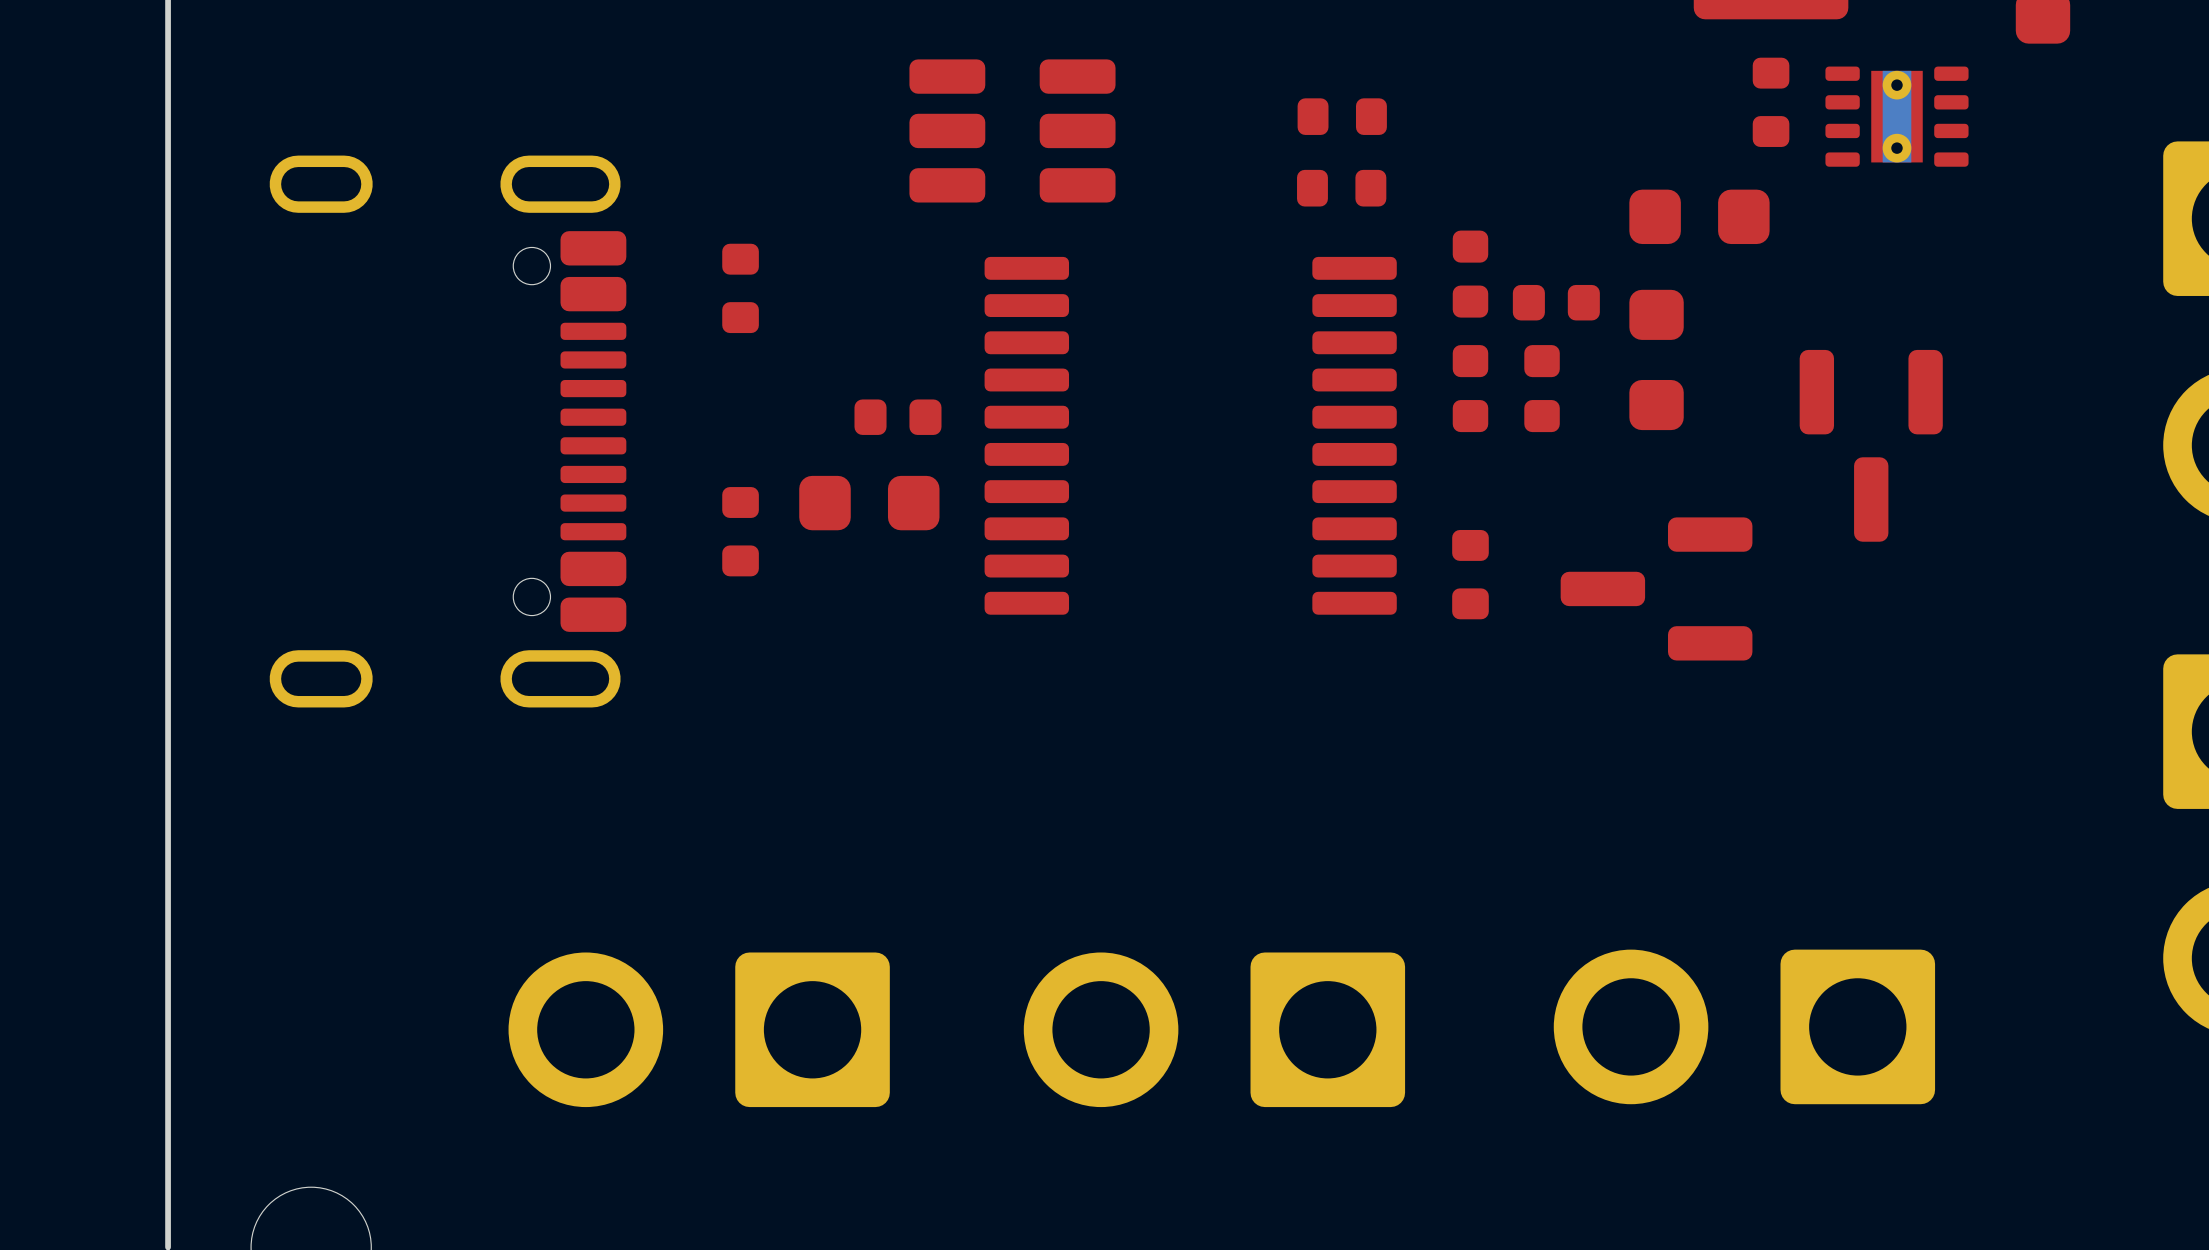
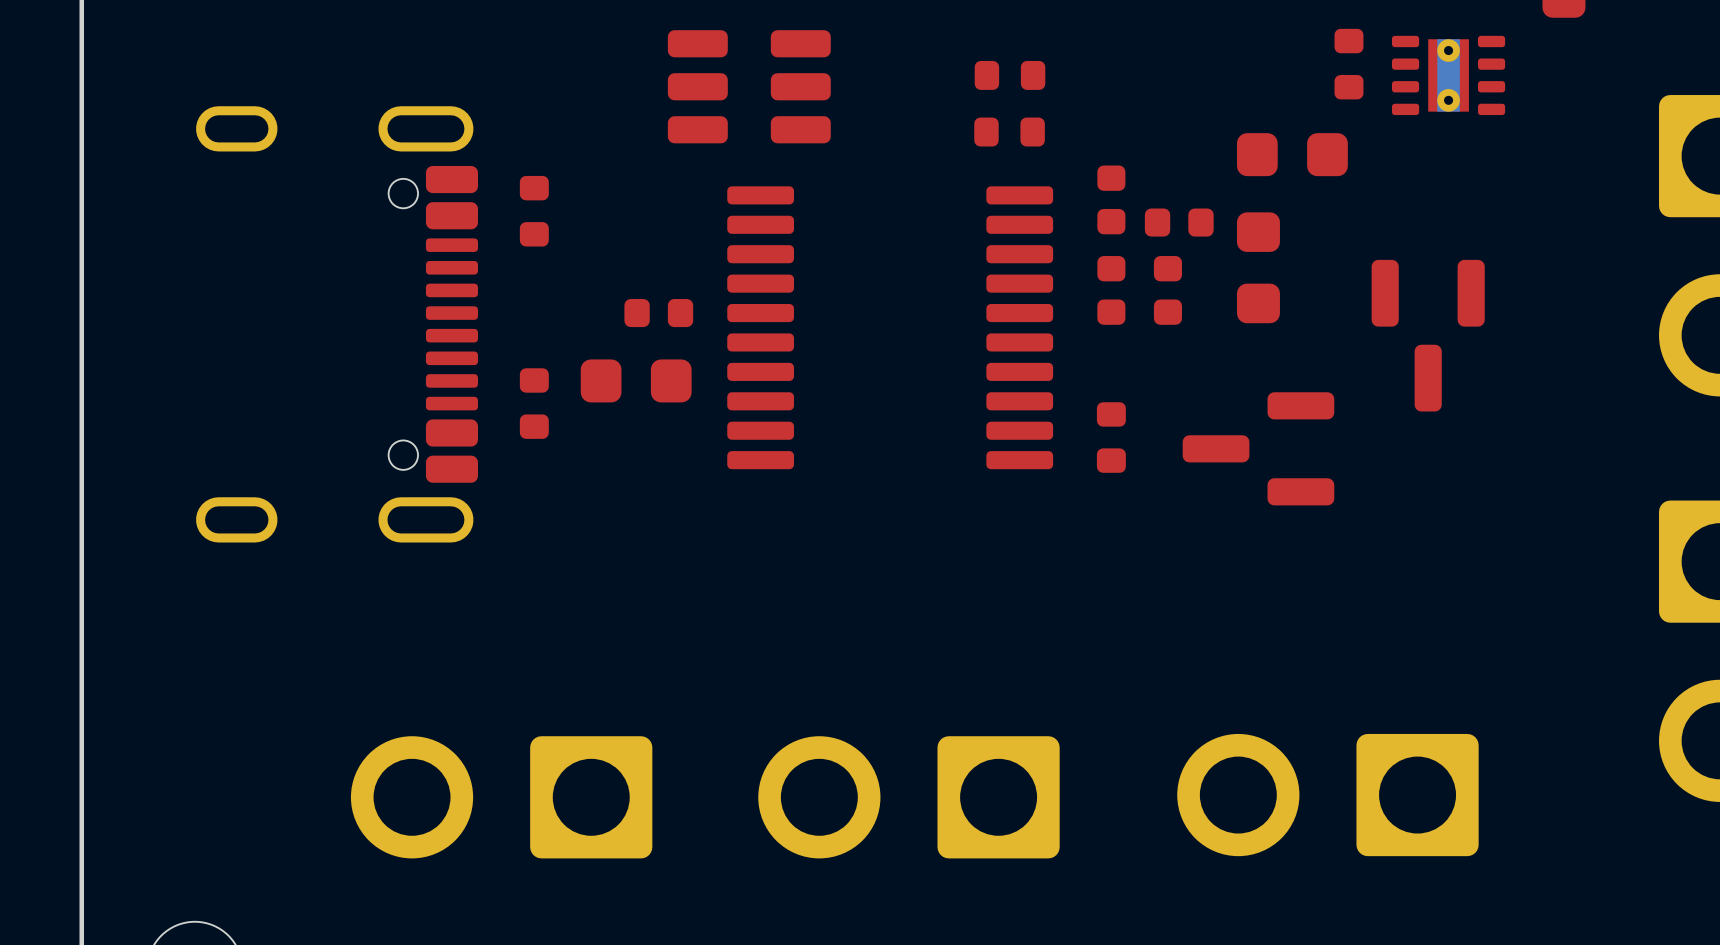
part position: (448, 431) -> (337, 324)

